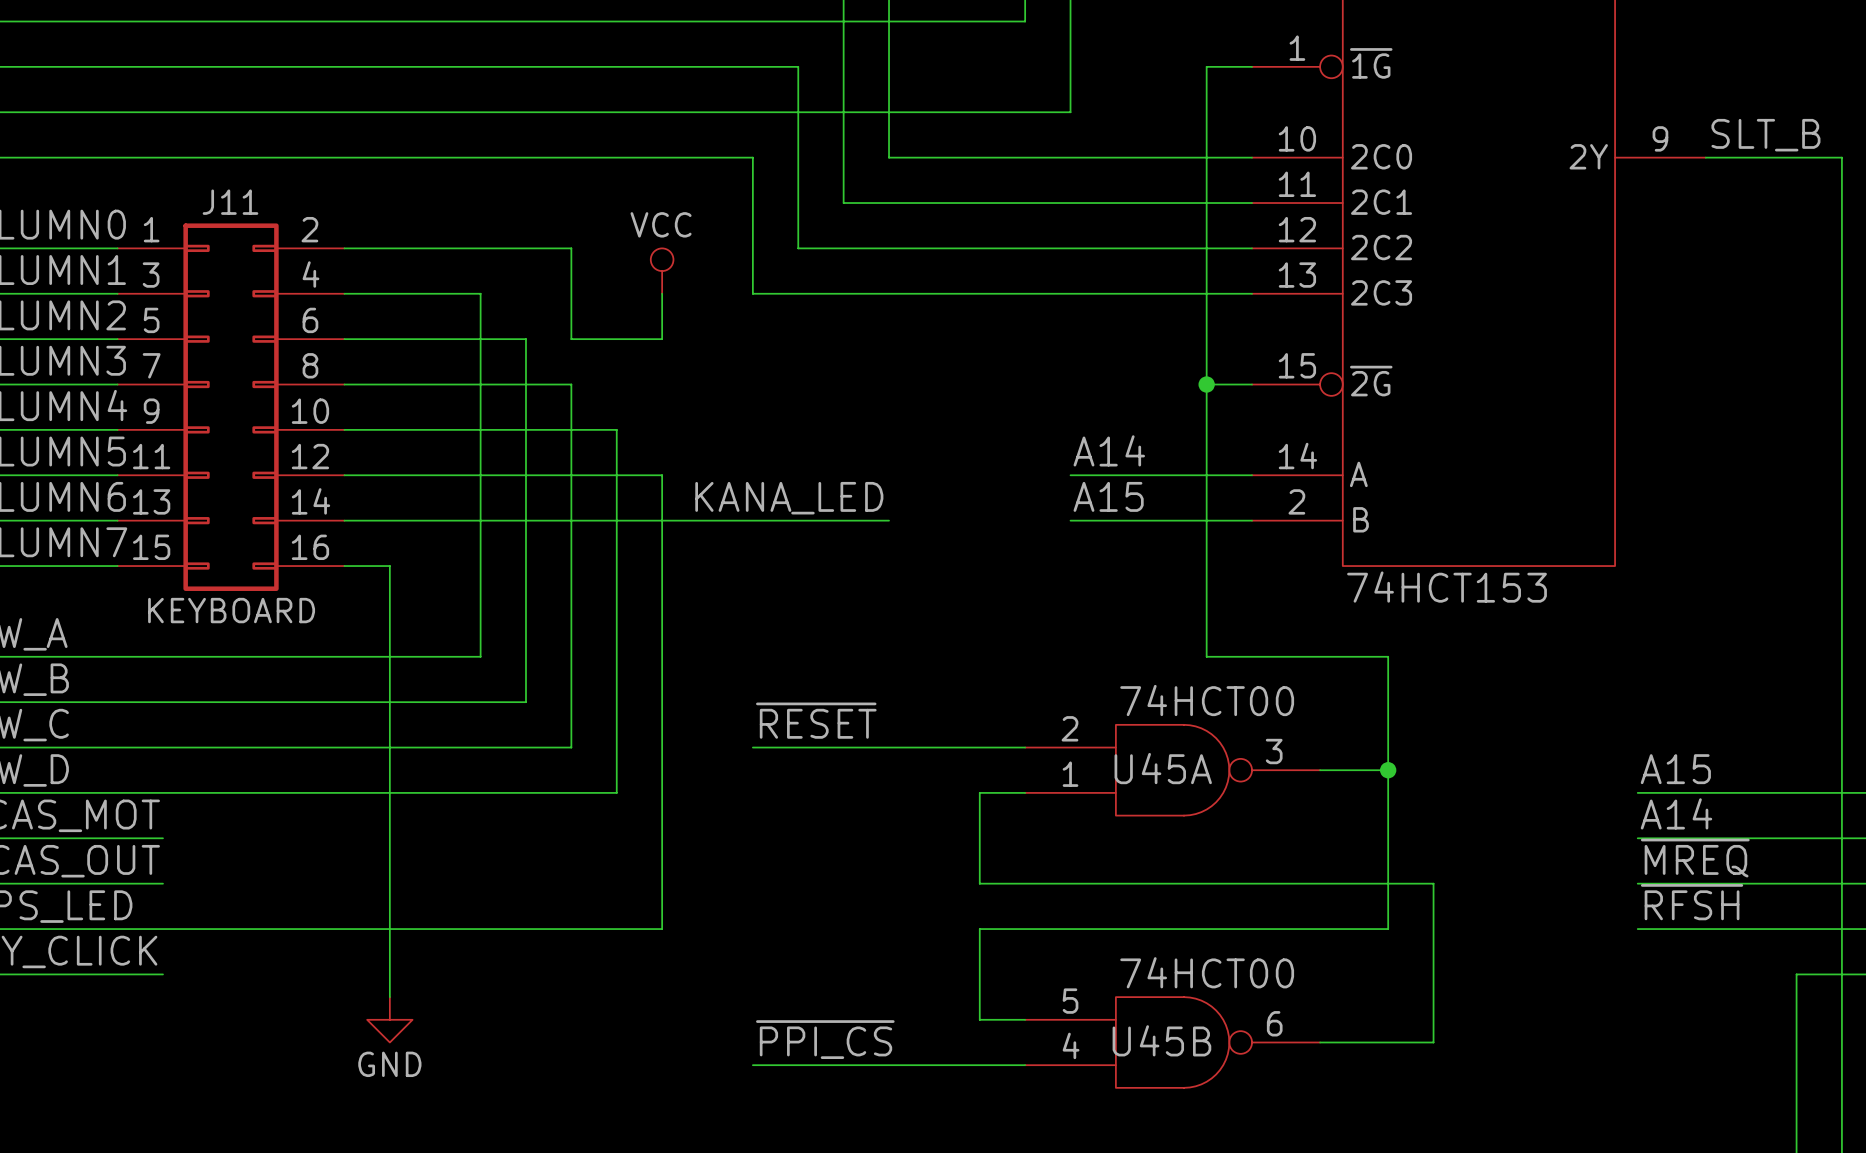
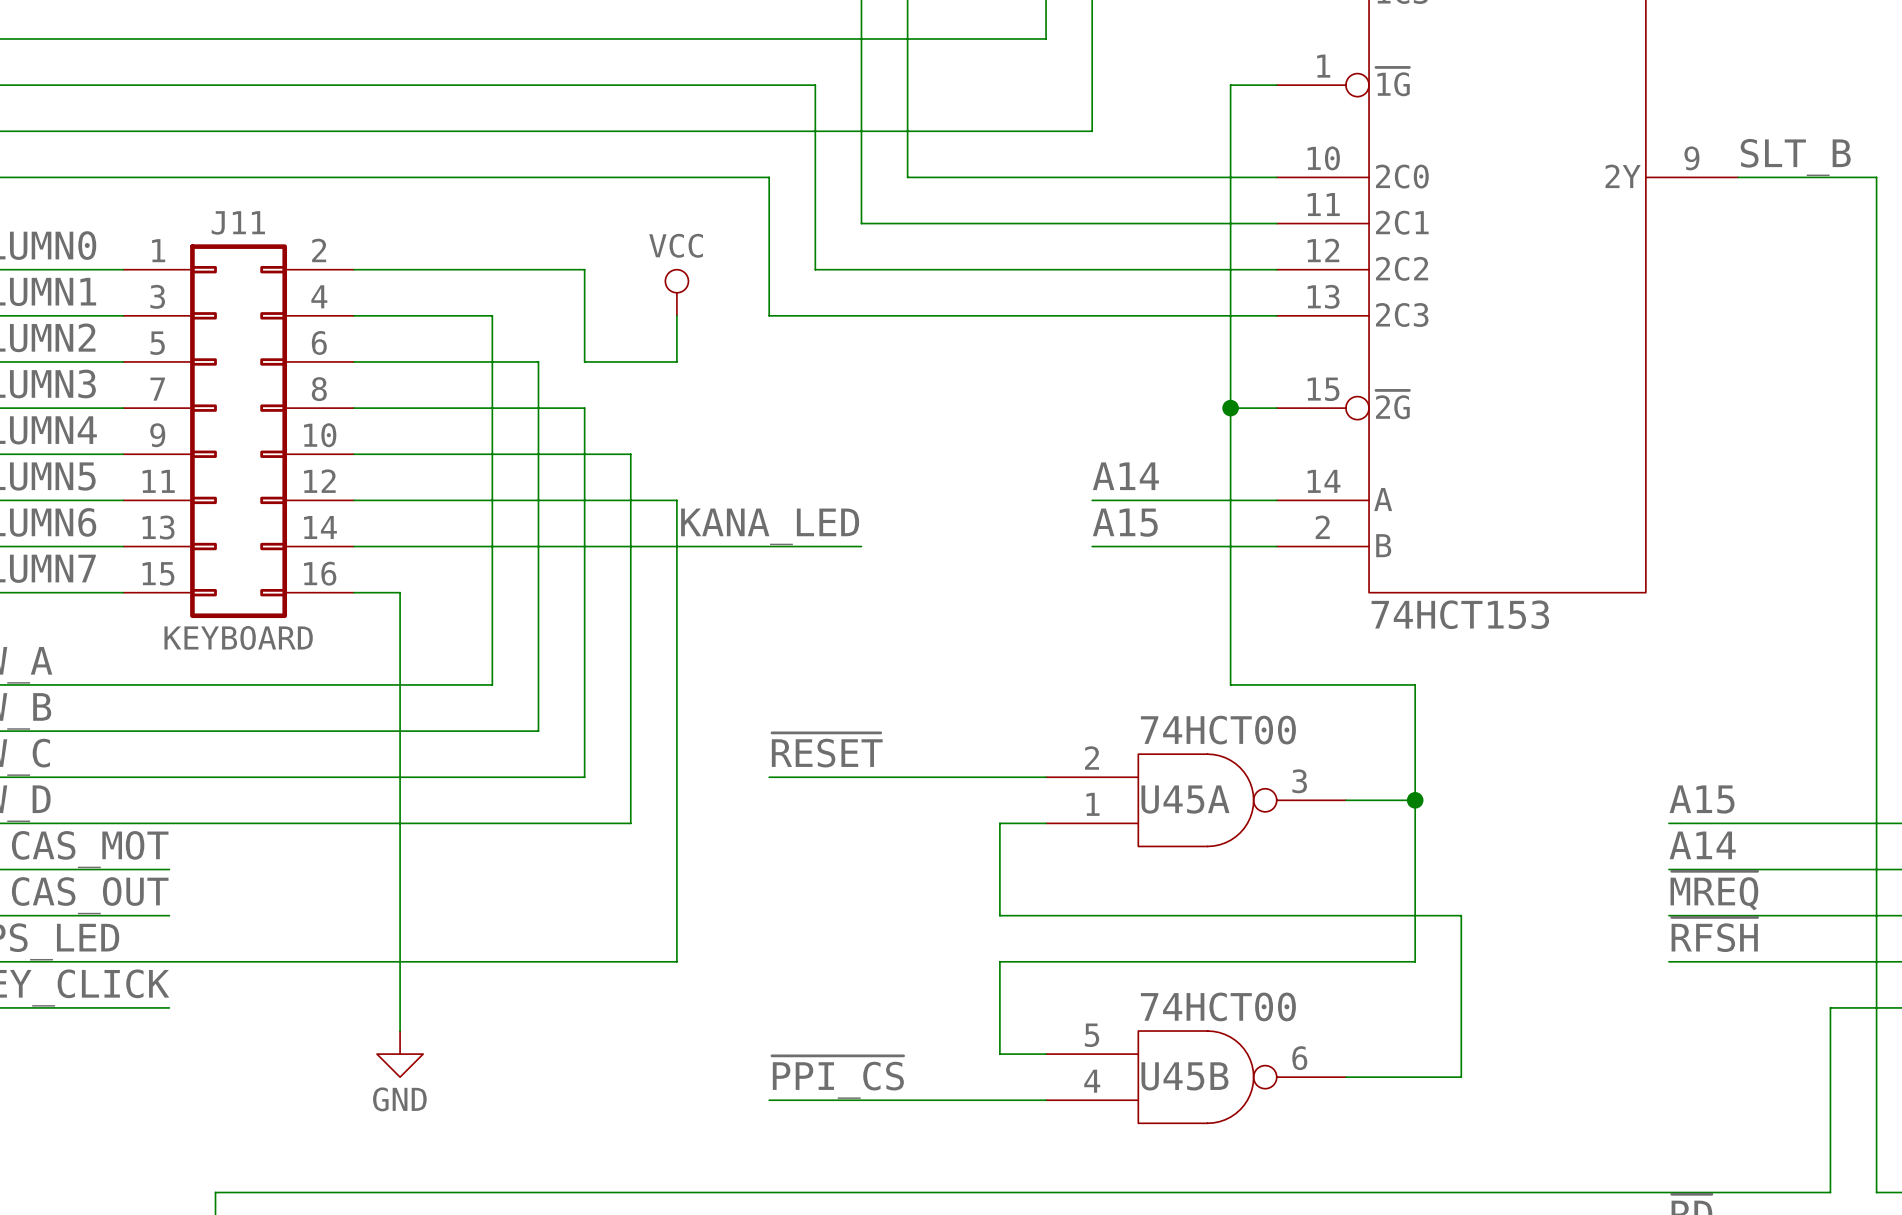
label position: KANA_LED (789, 498) -> KANA_LED (770, 526)
wire: (843, 520) (889, 520) -> none

